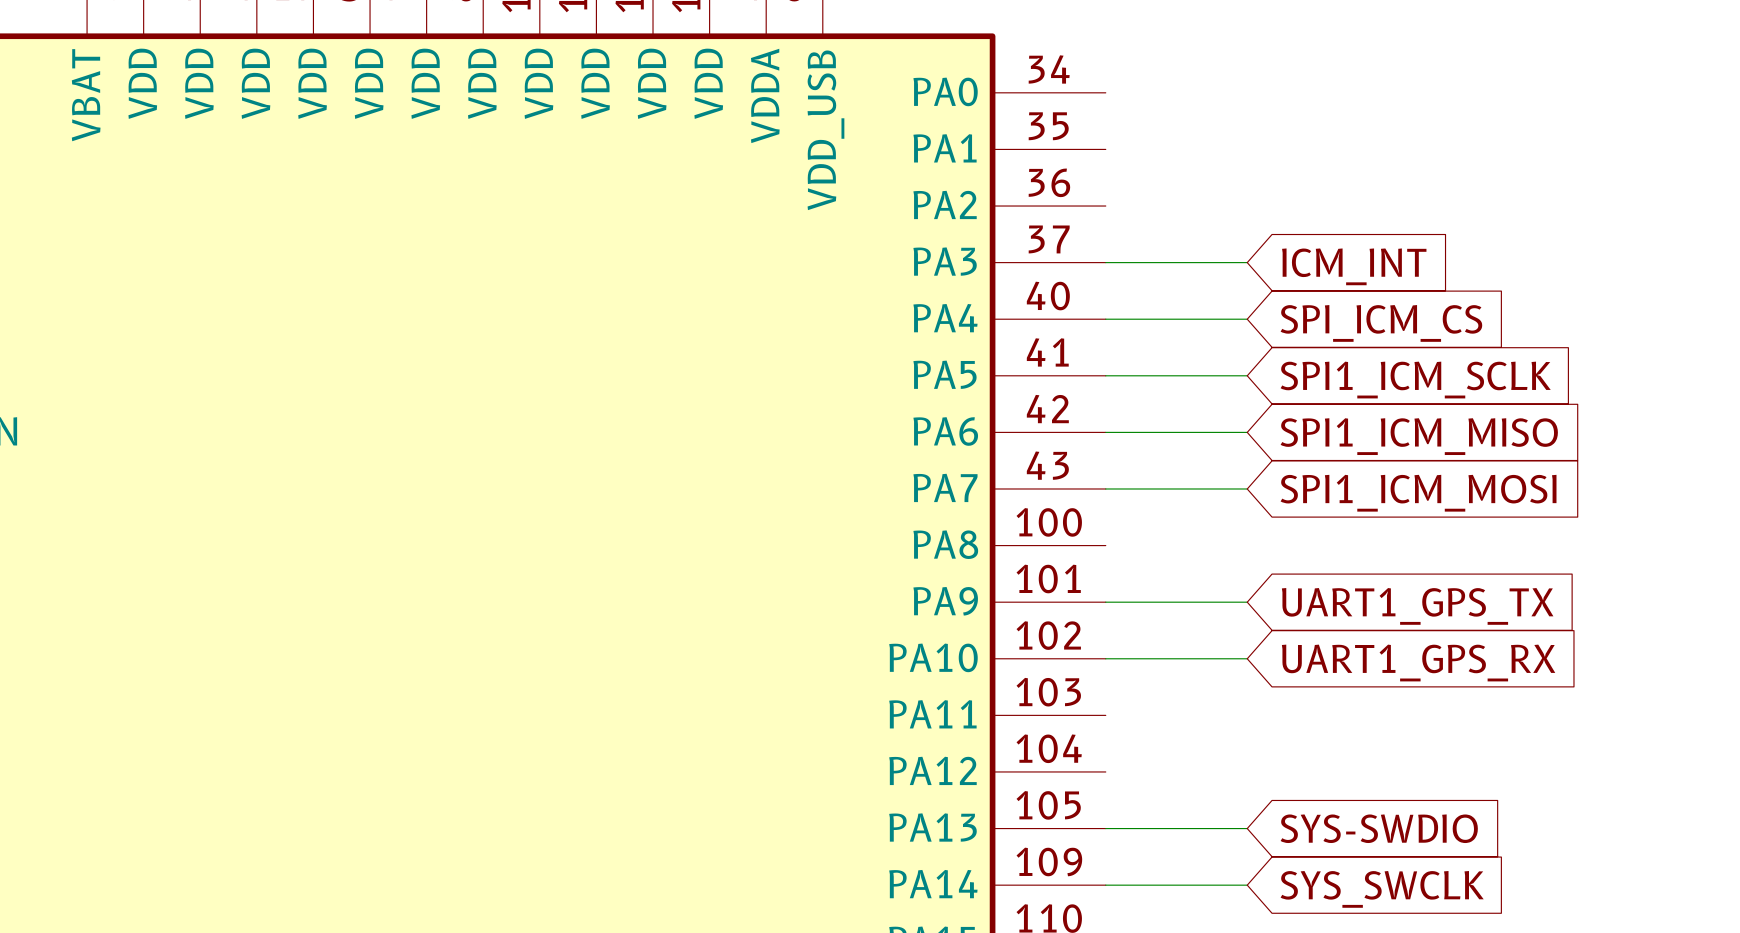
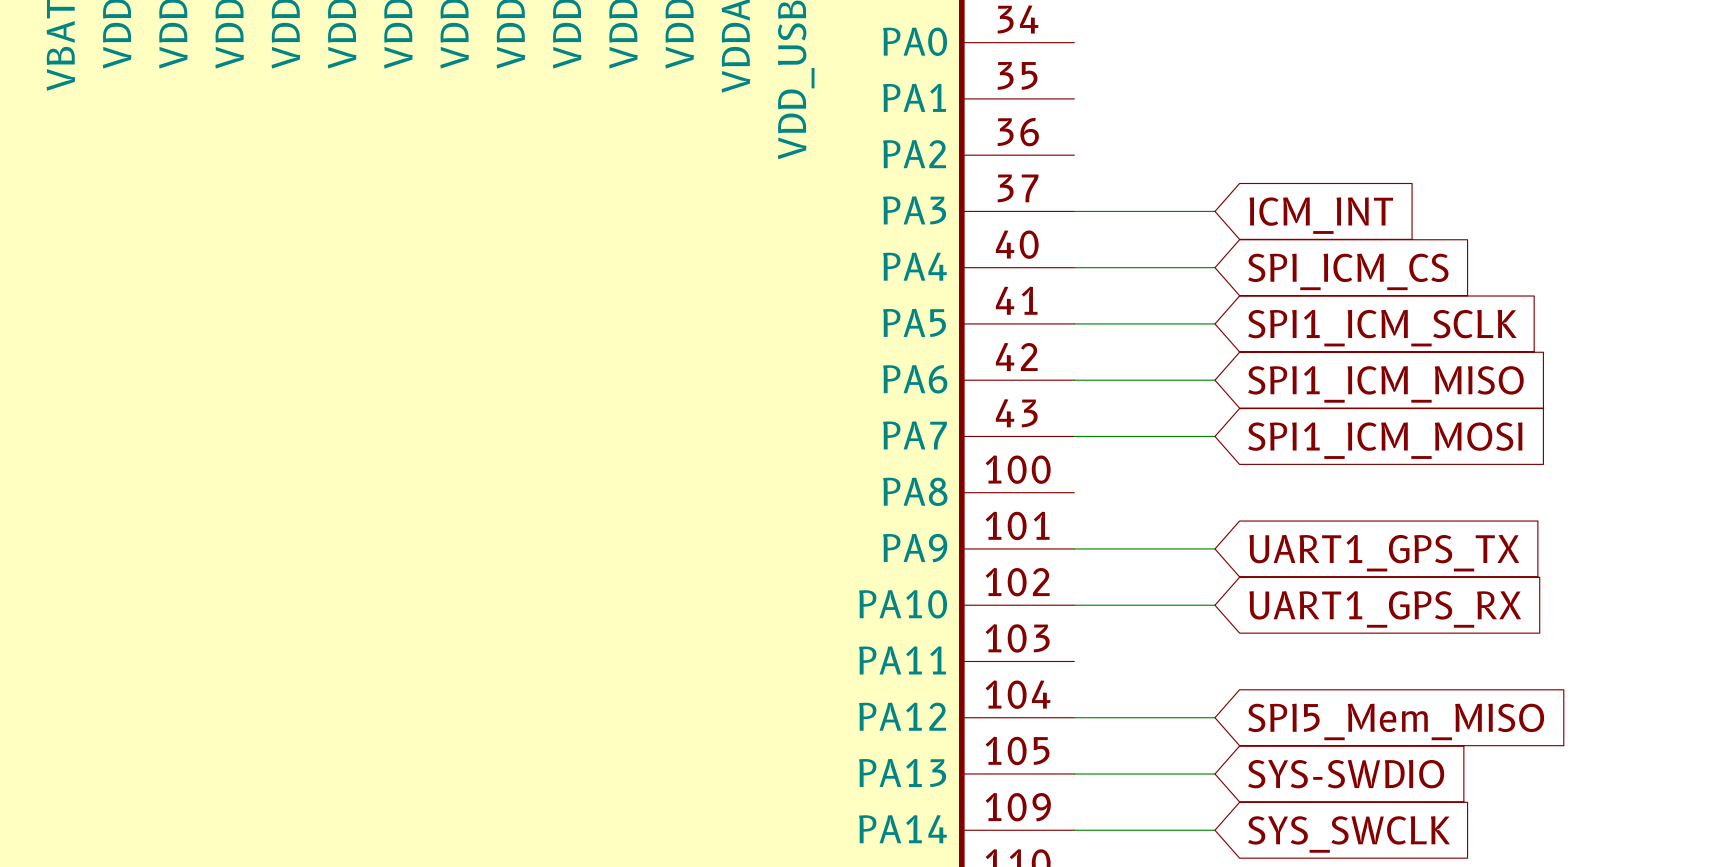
wire: none -> (1074, 717) (1214, 717)
global label: none -> SPI5_Mem_MISO (1396, 721)

